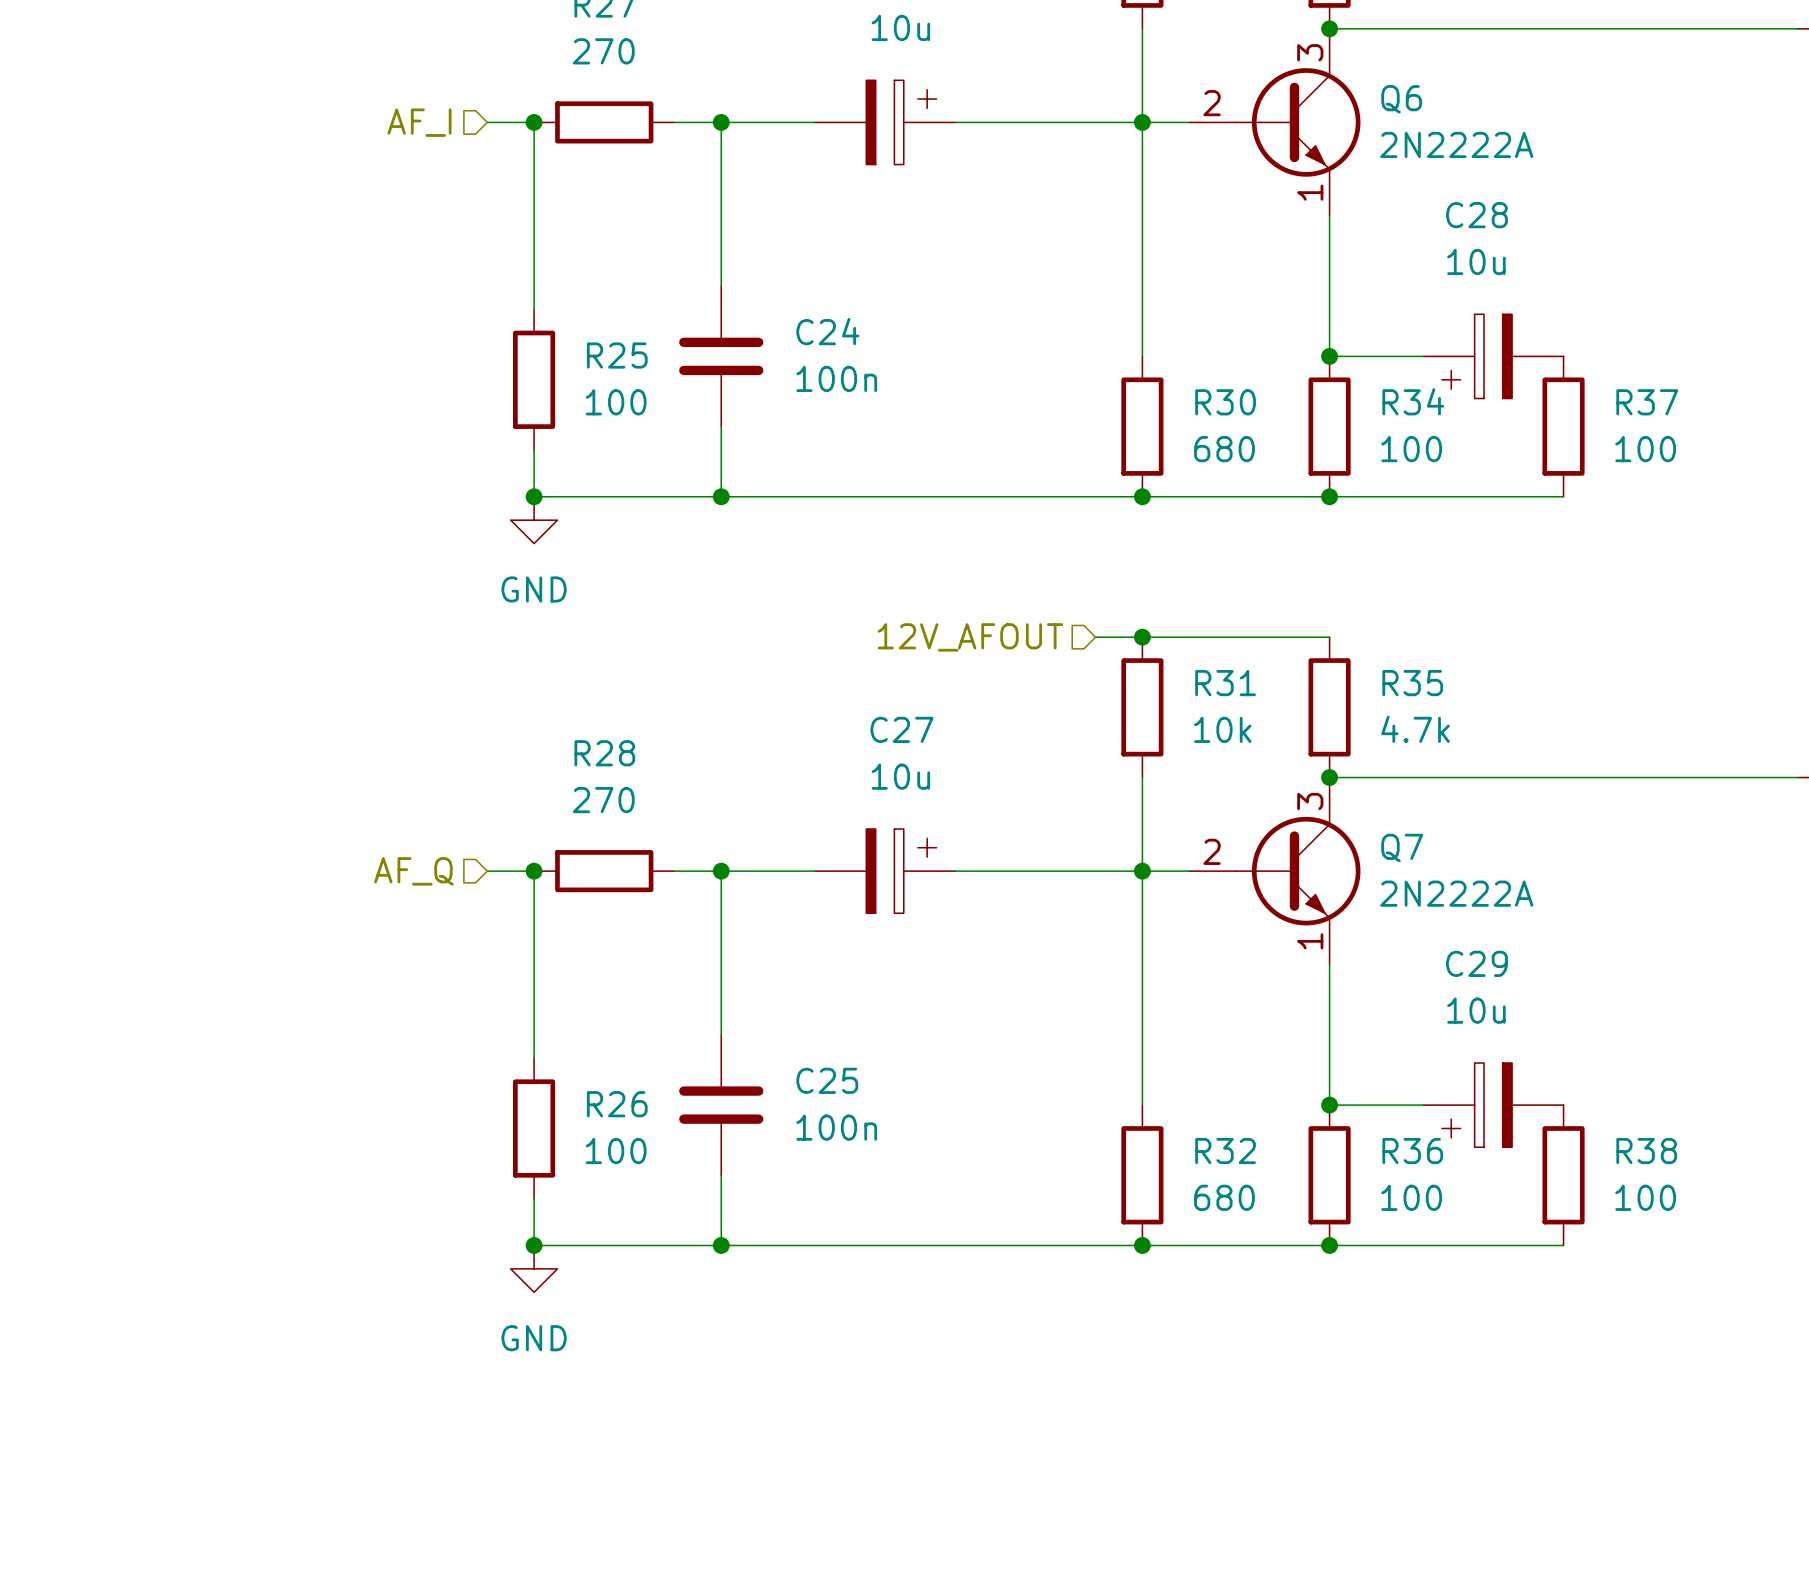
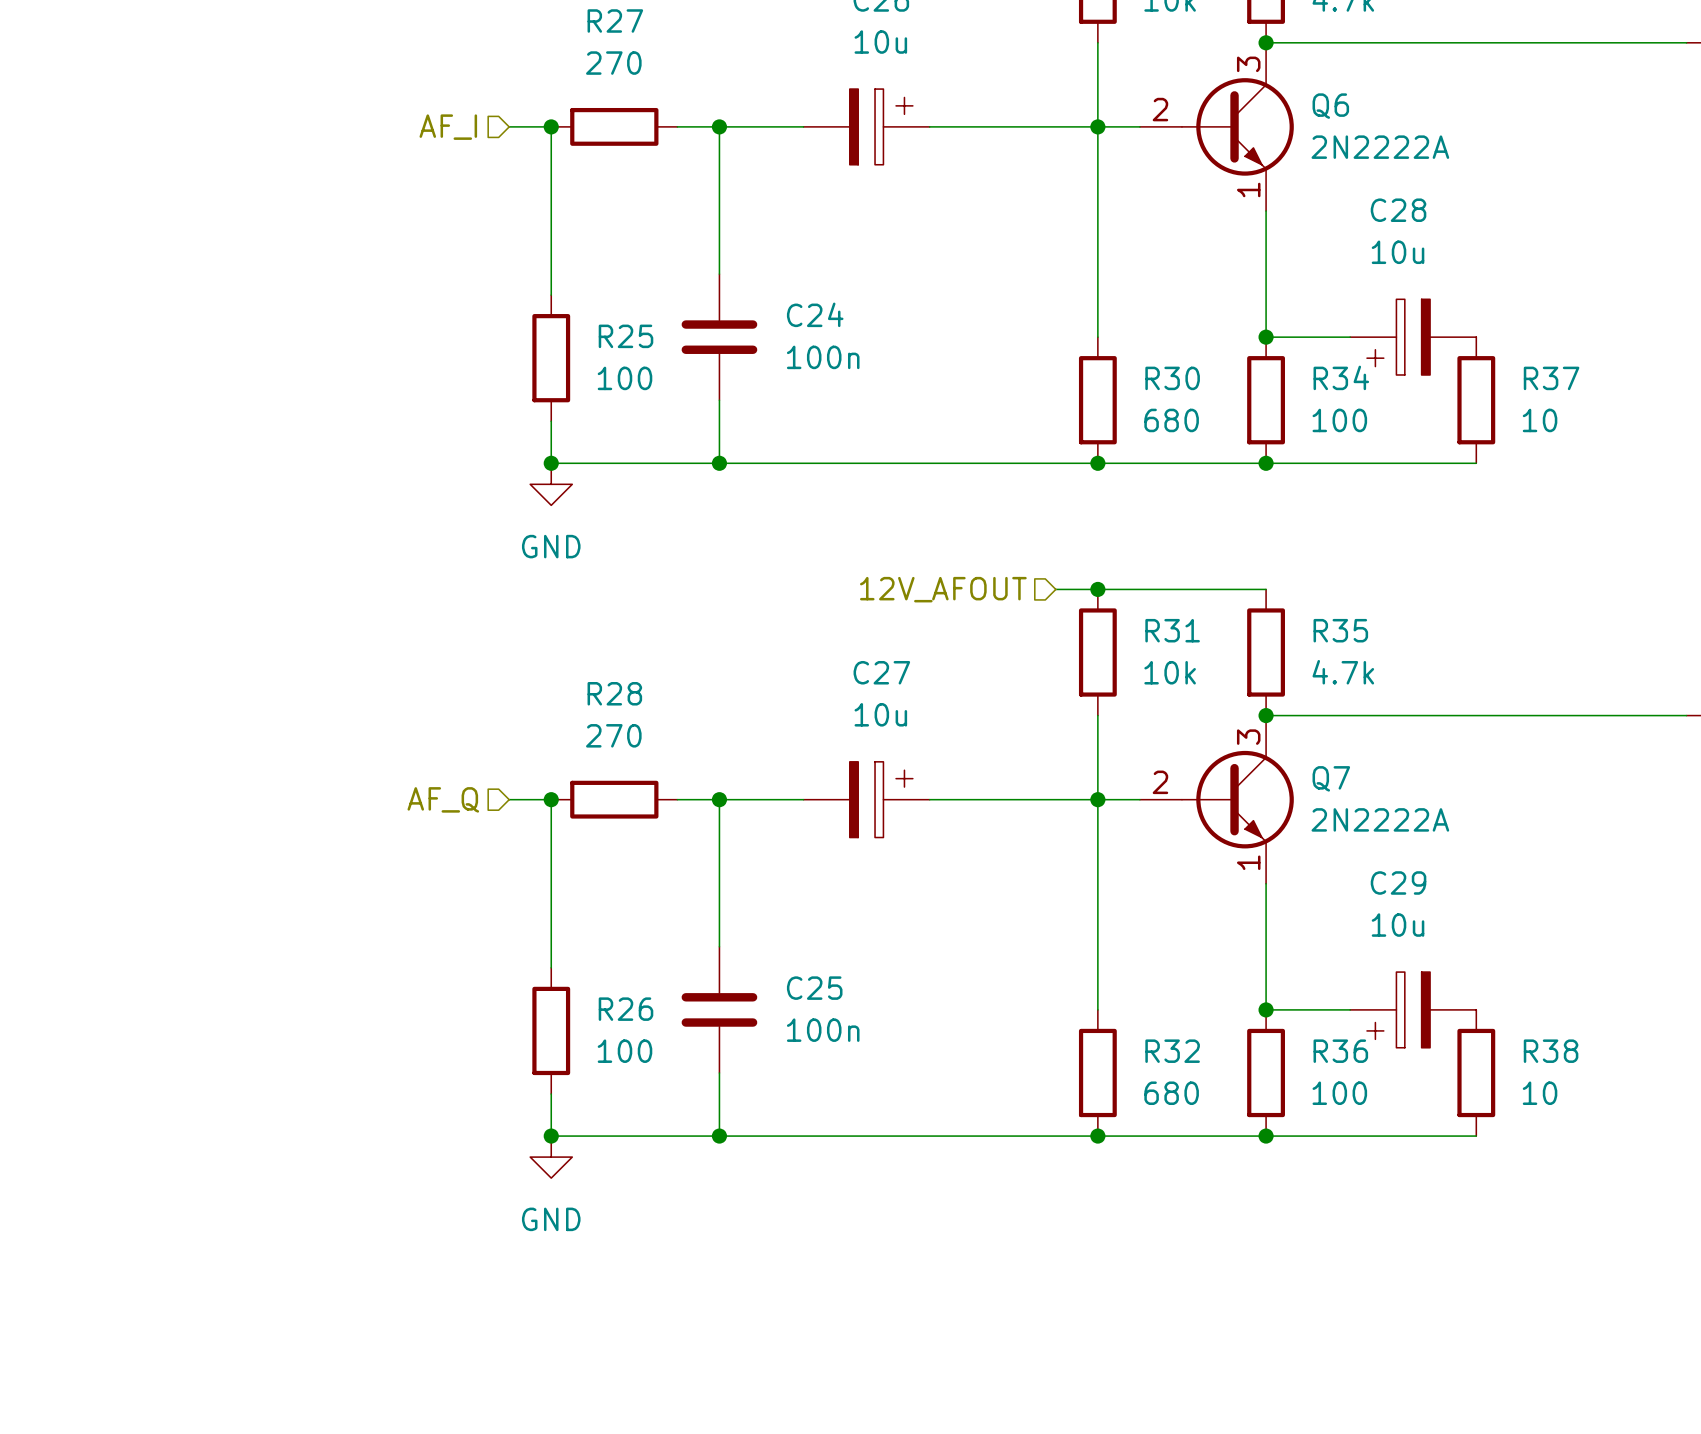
R37 value: 100 (1645, 449) -> 10 (1540, 420)
R38 value: 100 (1645, 1197) -> 10 (1540, 1093)

